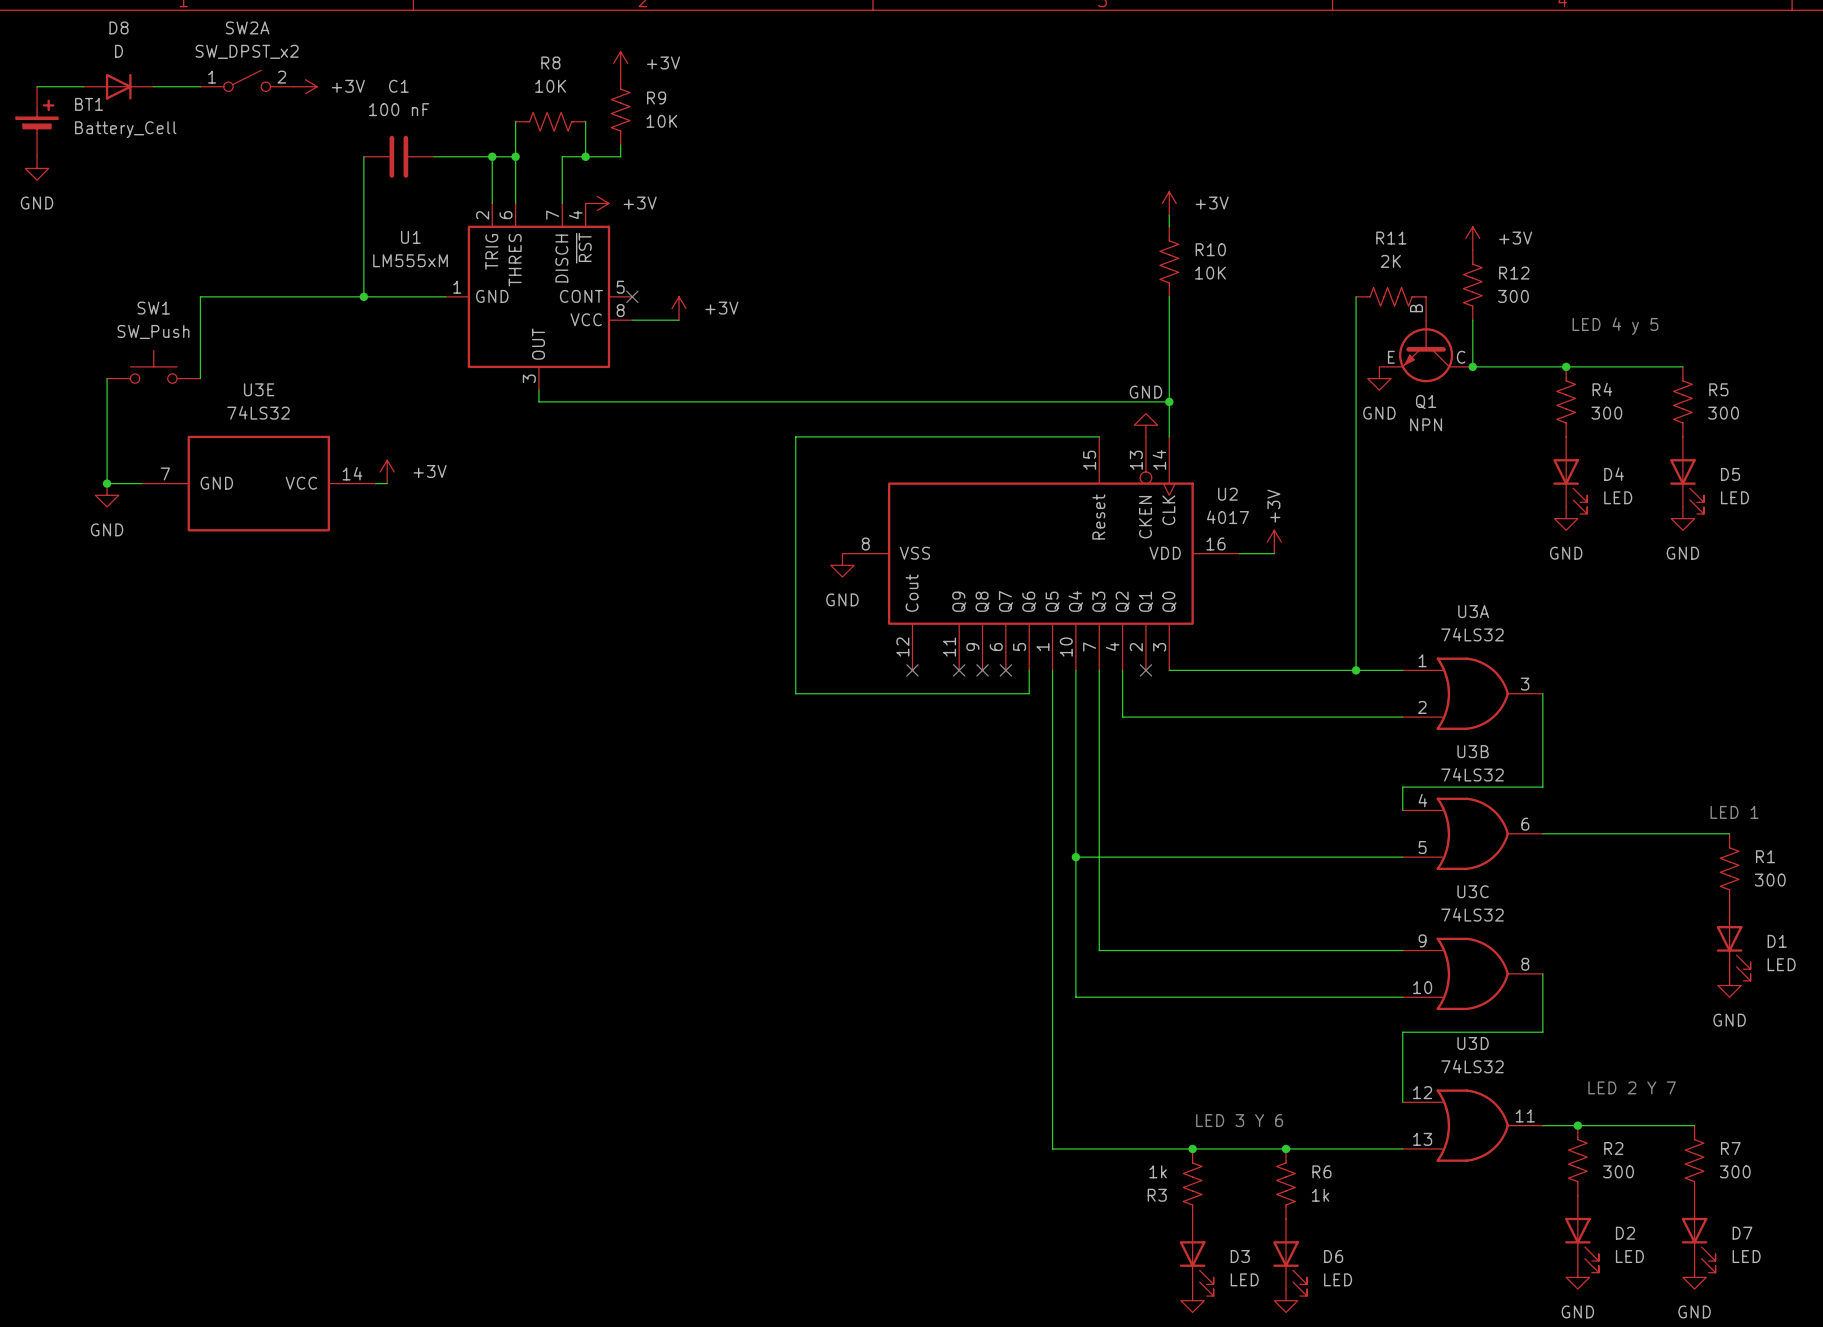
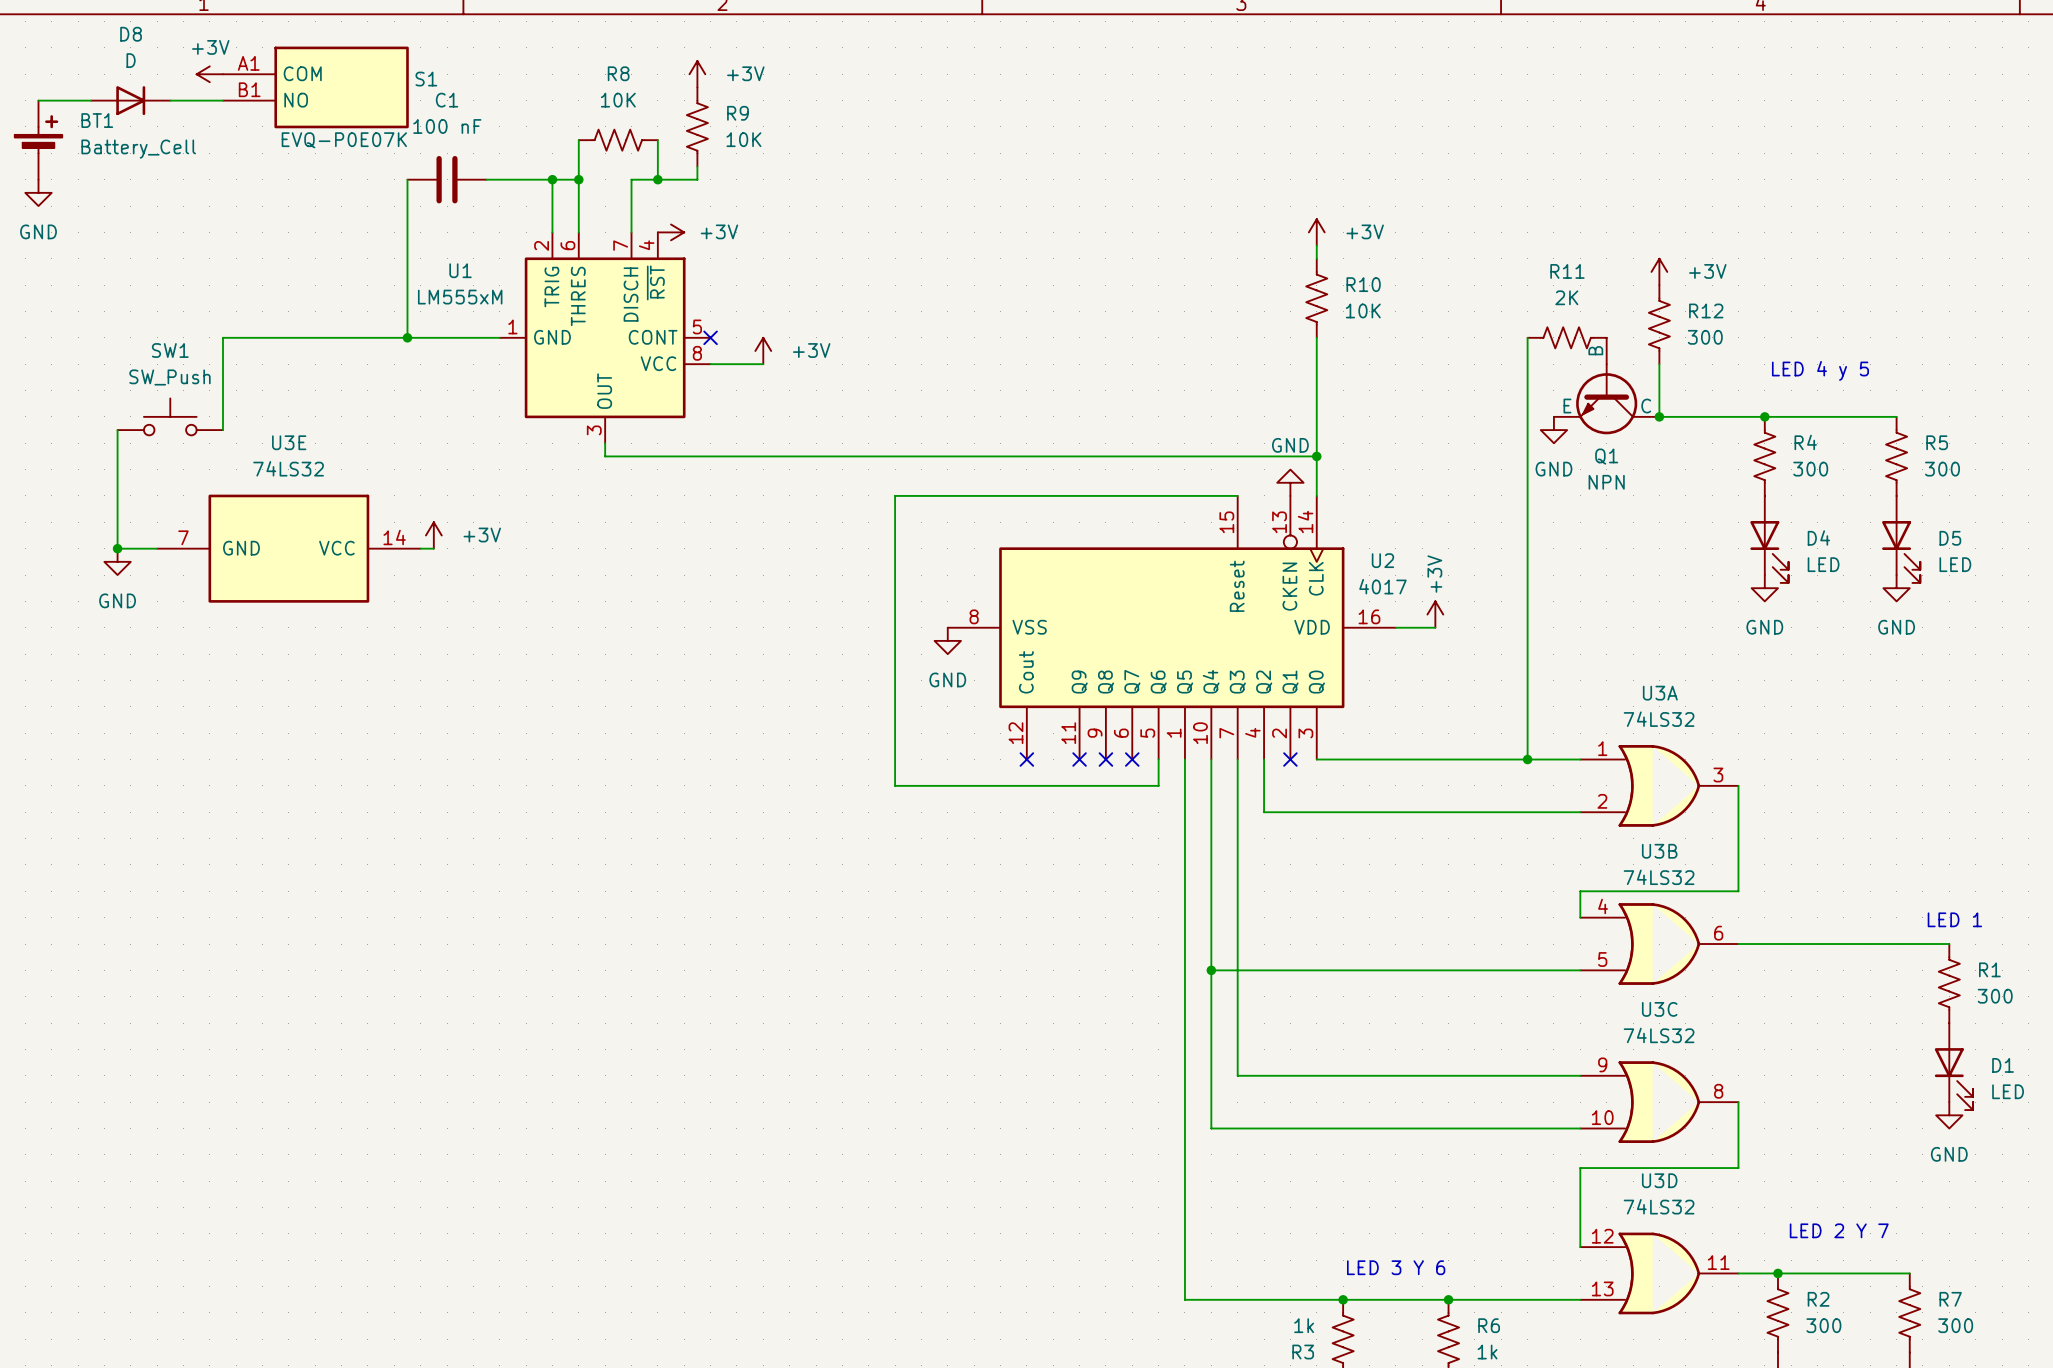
S1: none -> EVQ-P0E07K (315, 87)
SW2A: SW_DPST_x2 (247, 80) -> none
power symbol rotation: 0° (305, 86) -> 180° (209, 74)
power symbol position: +3V (305, 86) -> +3V (209, 74)
power symbol text position: +3V (348, 86) -> +3V (210, 47)

